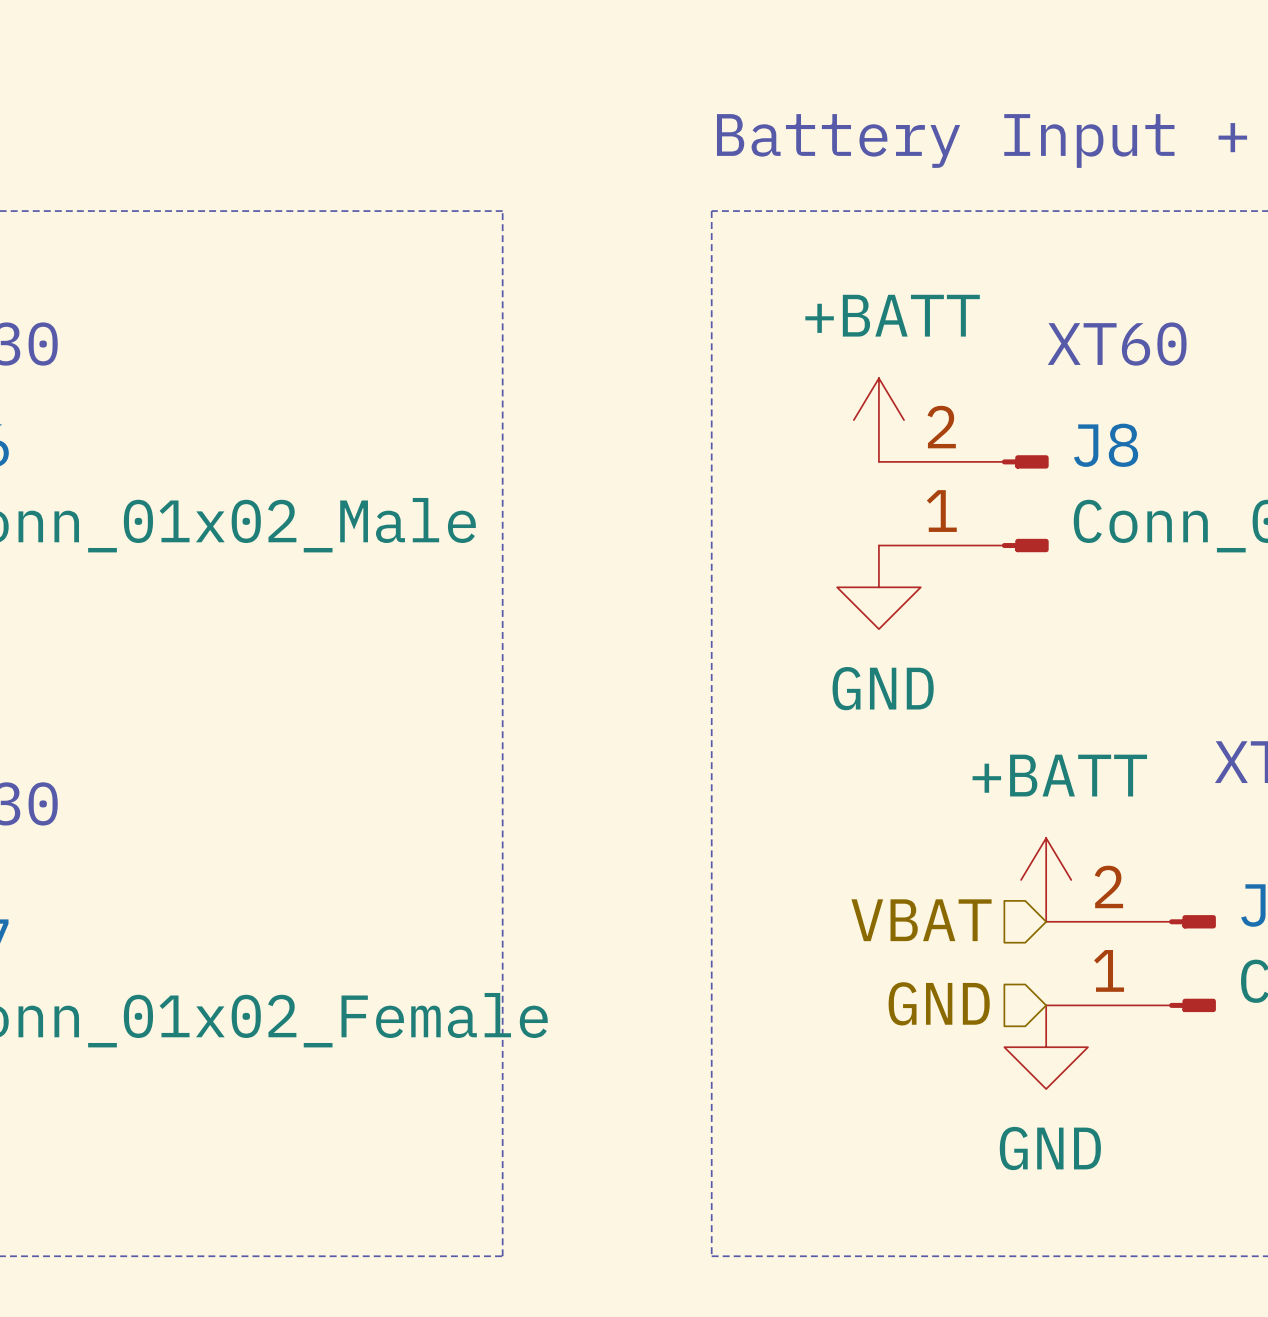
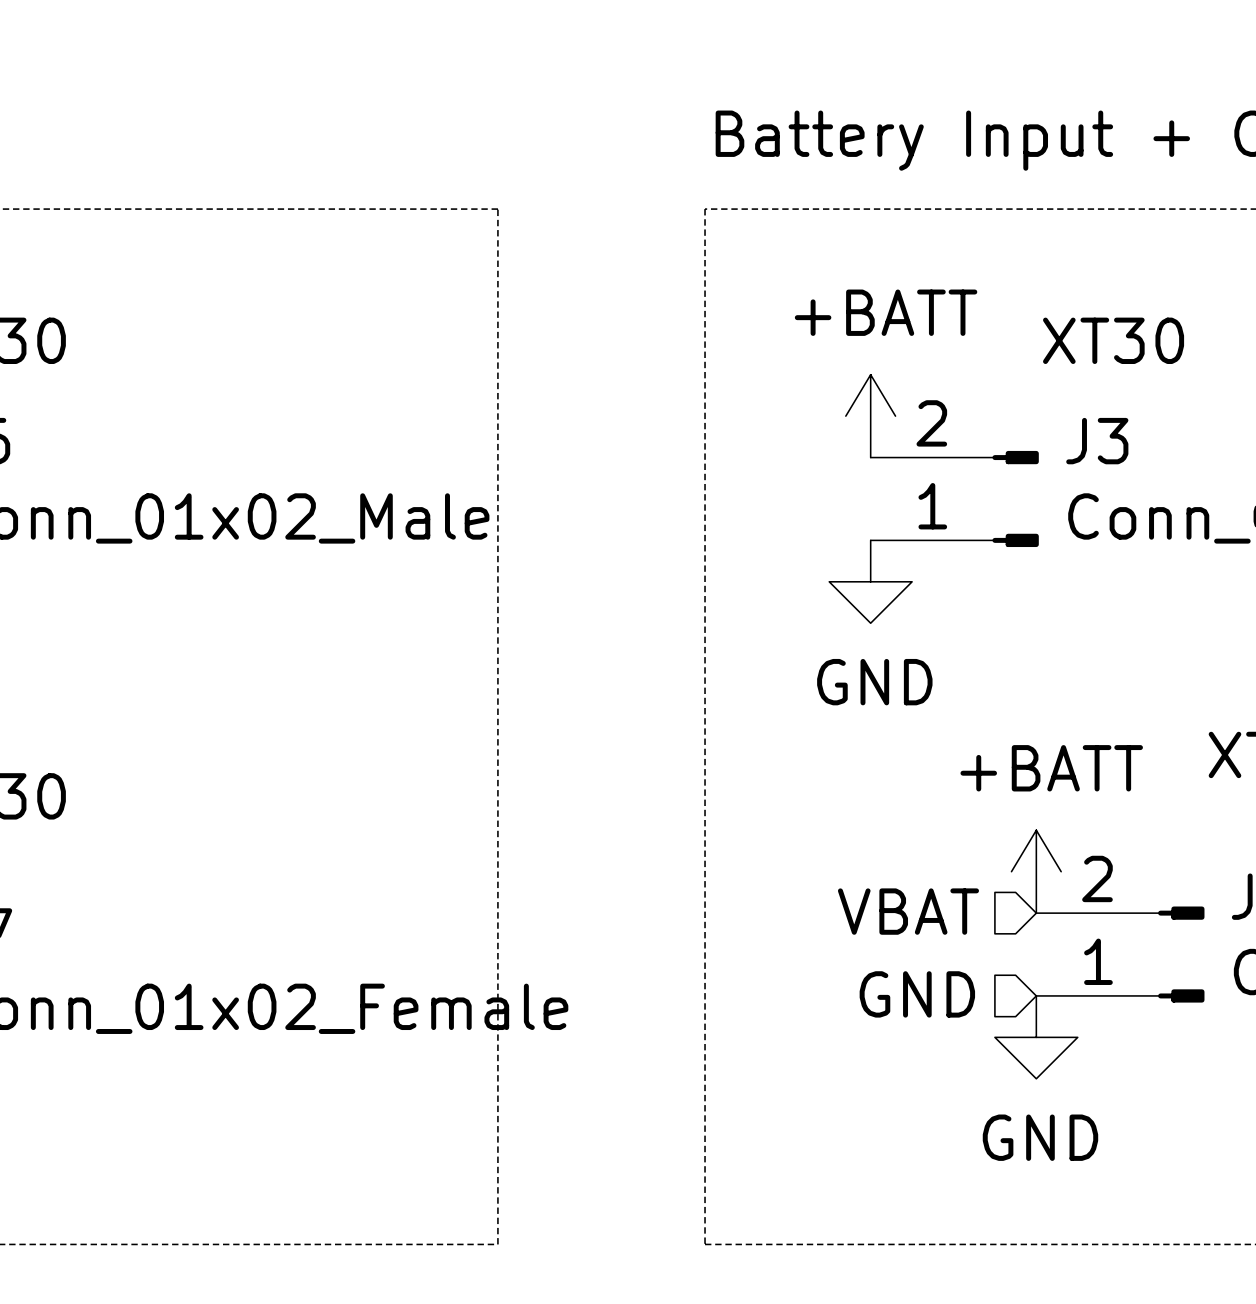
text: XT60 (1117, 344) -> XT30 (1113, 340)
J8 name: J8 (1106, 445) -> J3 (1097, 441)

